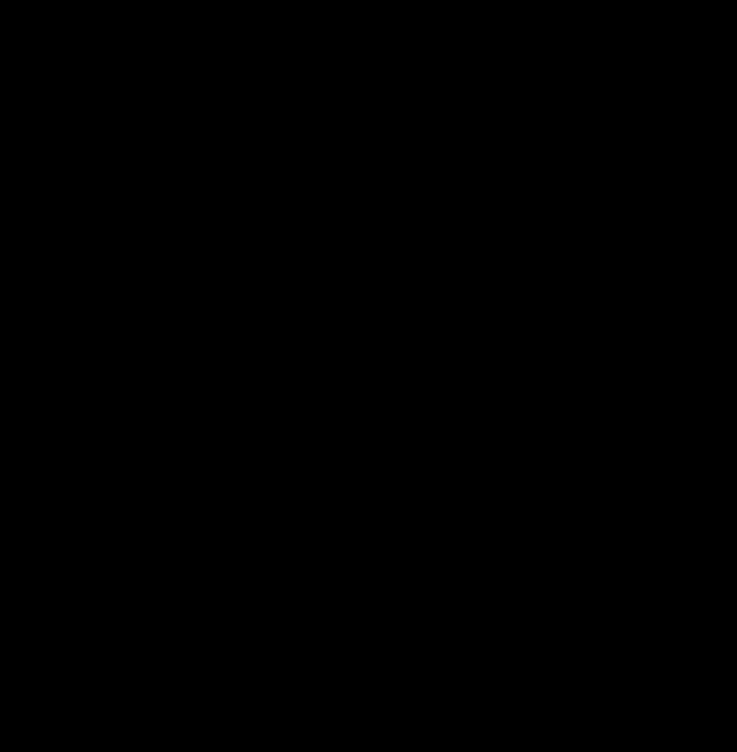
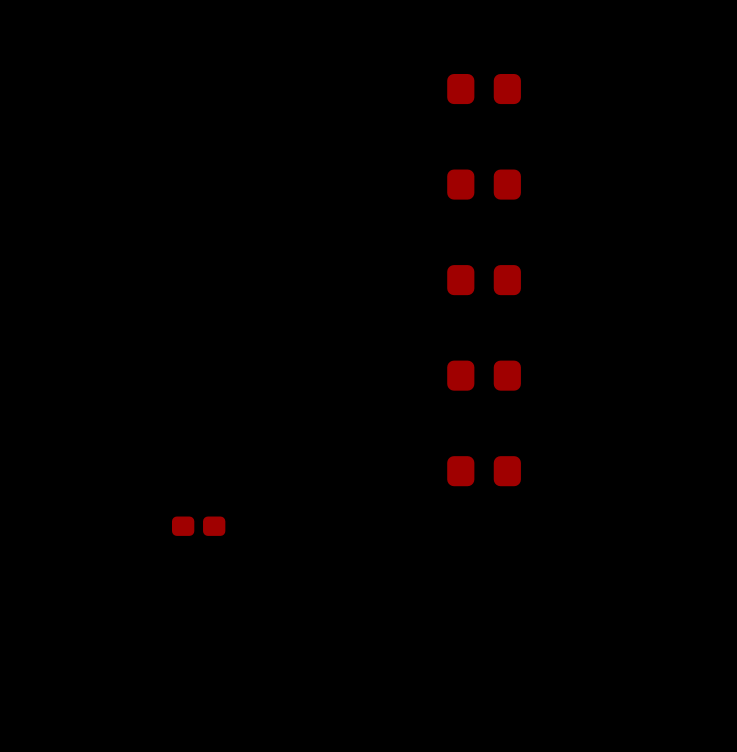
part: none -> (484, 89)
part: none -> (484, 184)
part: none -> (484, 280)
part: none -> (484, 375)
part: none -> (484, 471)
part: none -> (198, 526)

